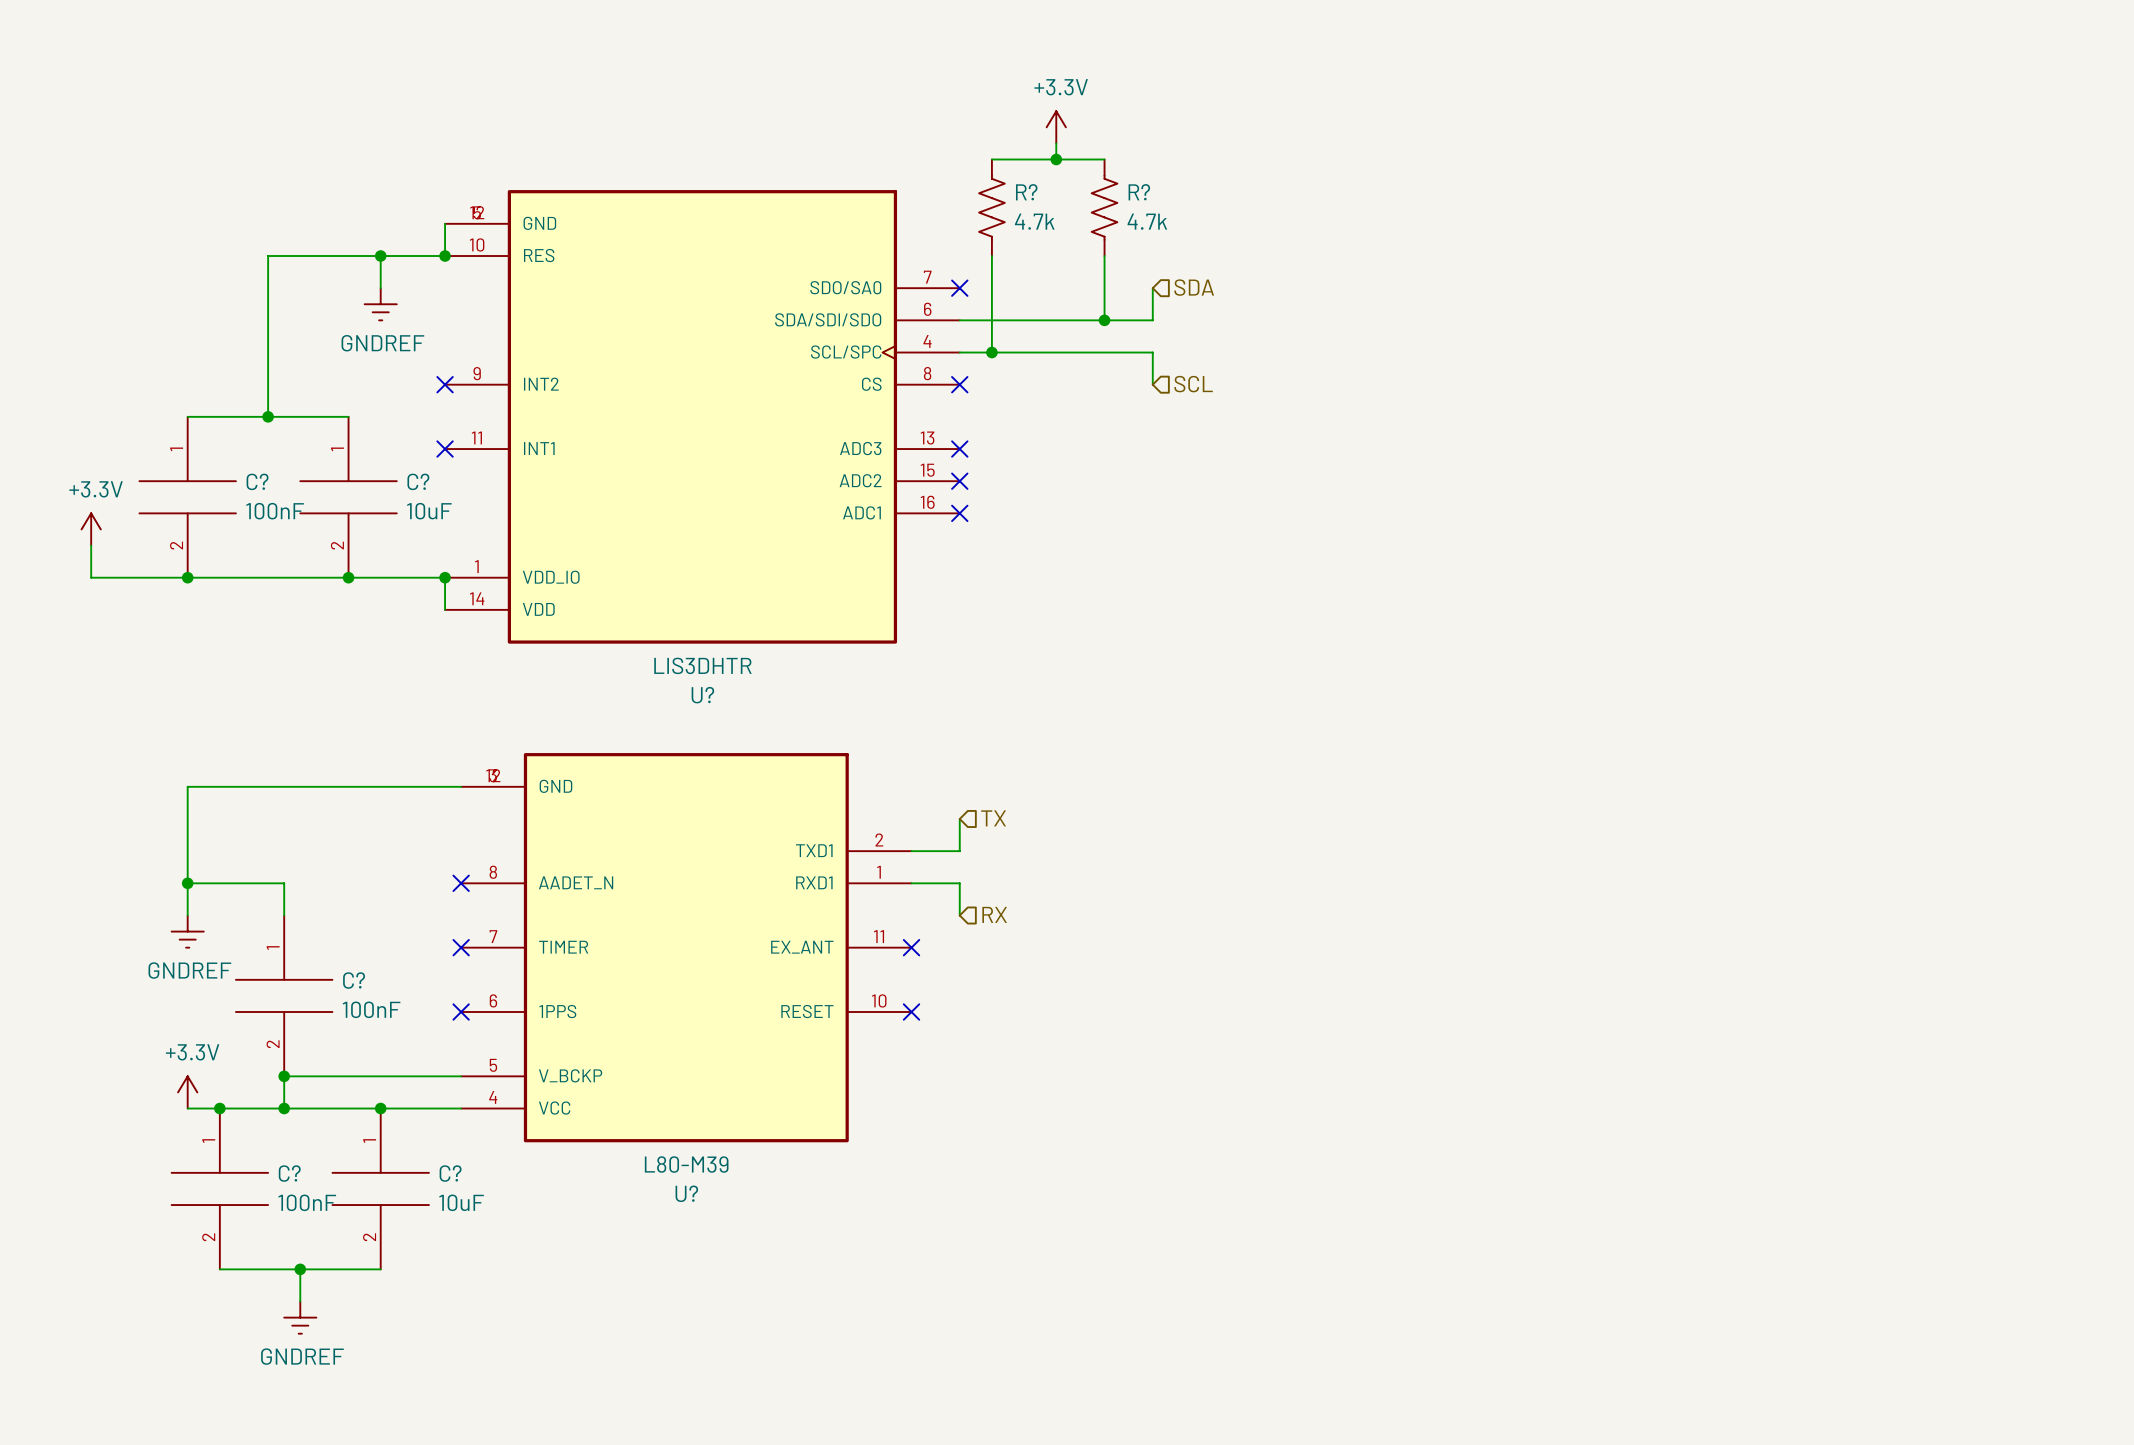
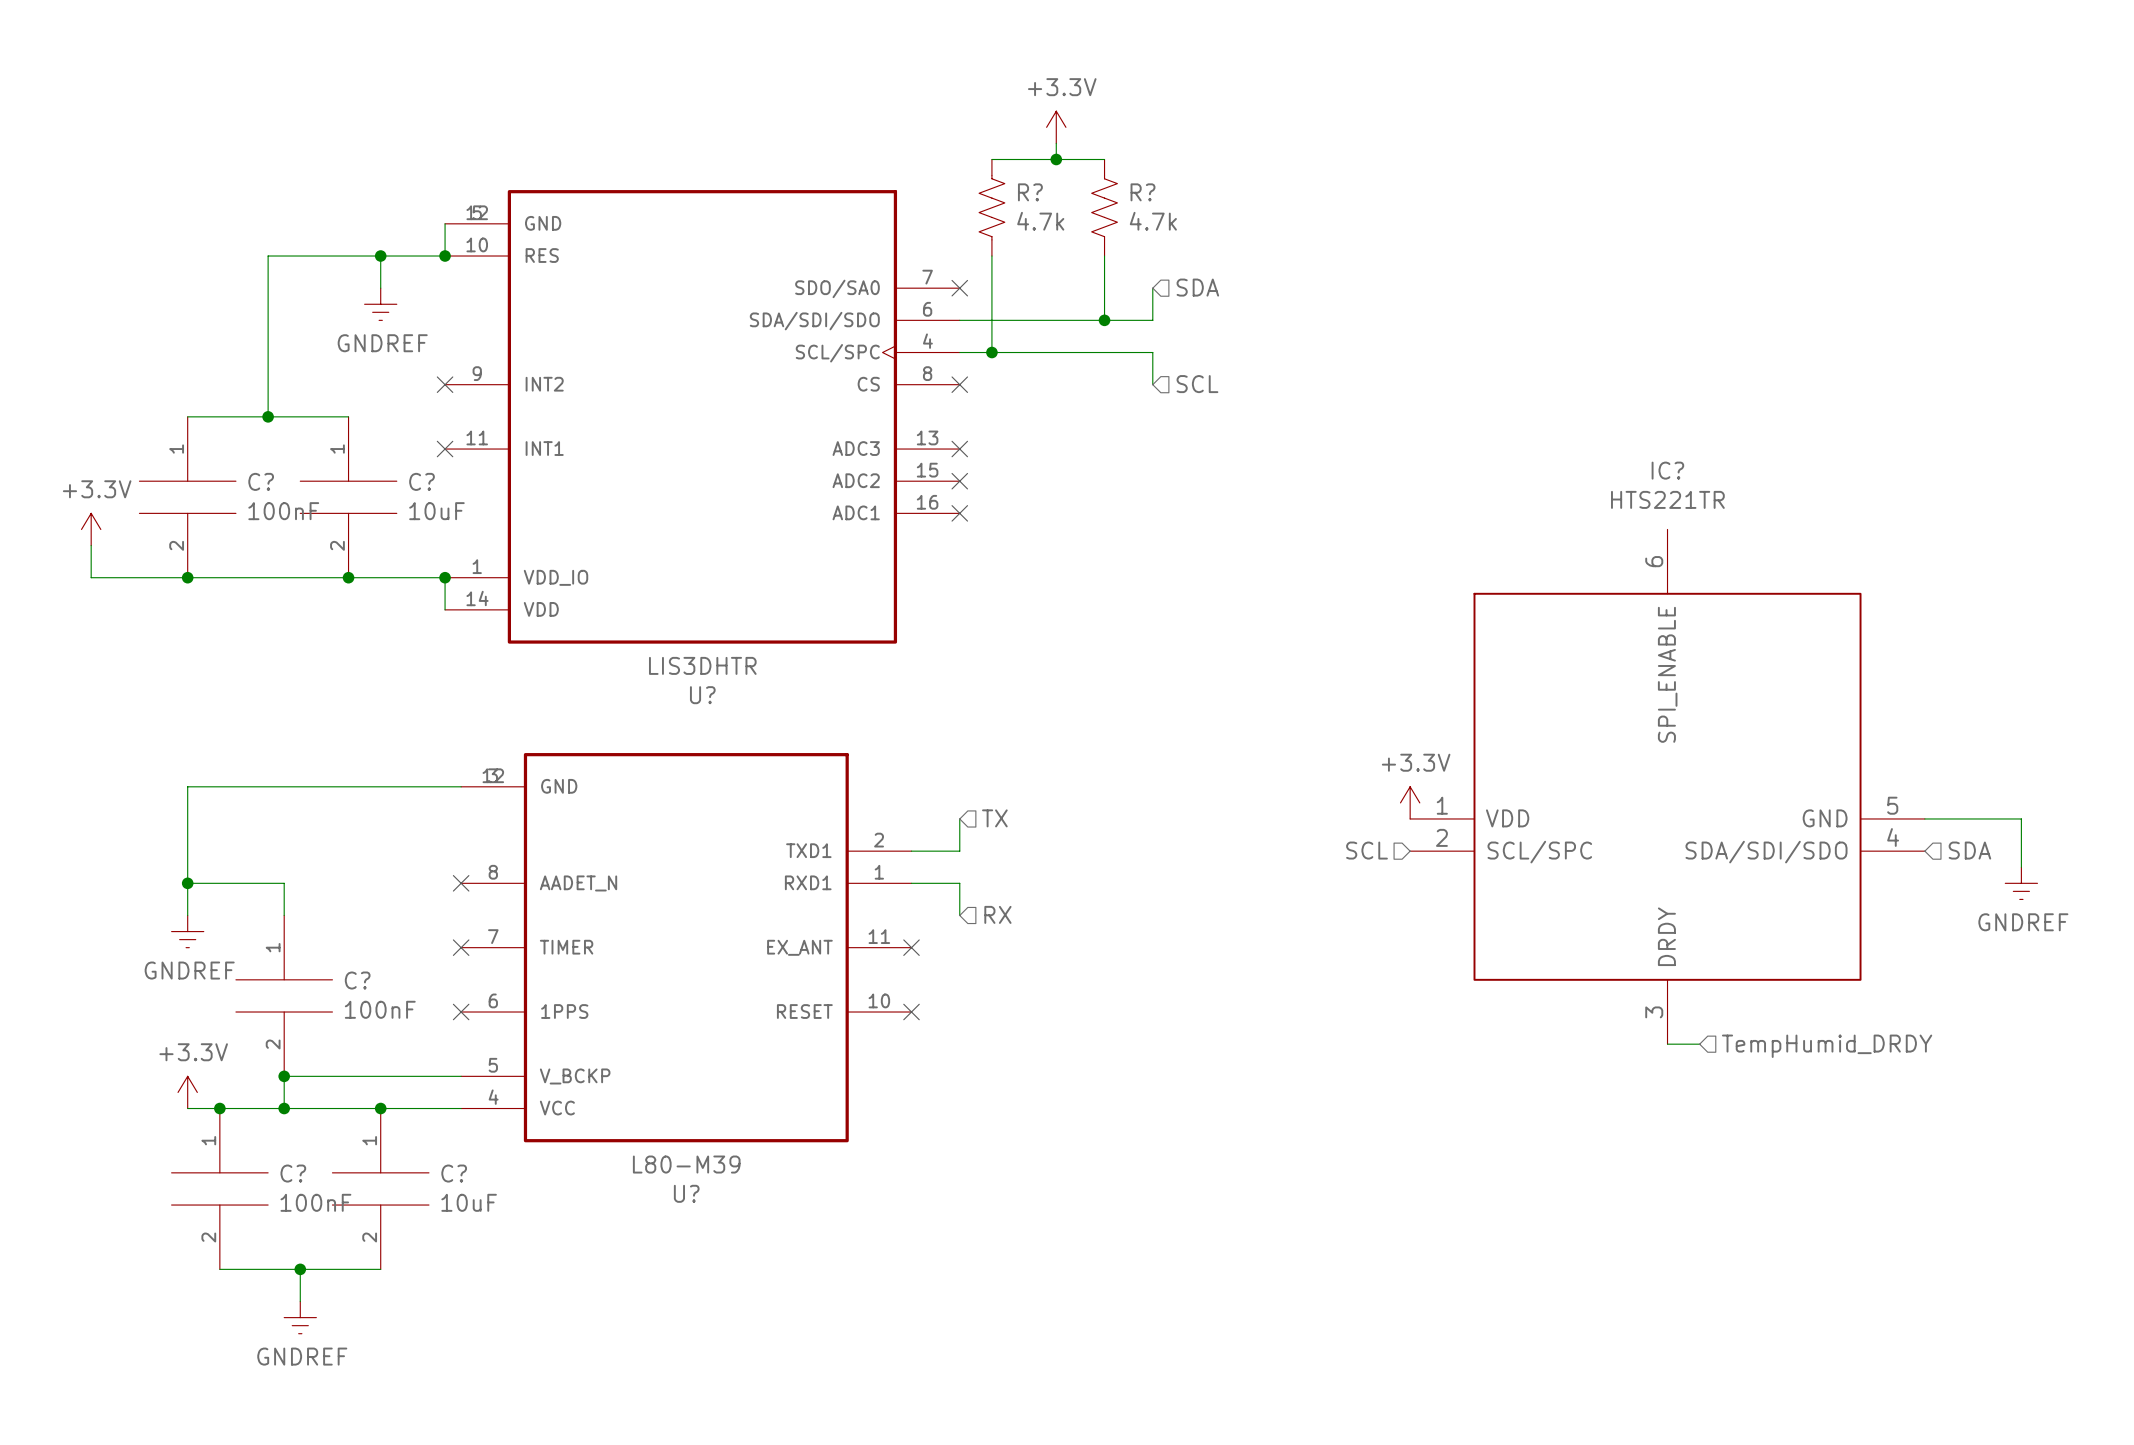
IC?: none -> HTS221TR (1667, 786)
power symbol: none -> +3.3V (1410, 802)
wire: none -> (1924, 818) (2021, 818) (2021, 867)
hierarchical label: none -> SCL (1367, 850)
hierarchical label: none -> SDA (1969, 850)
power symbol: none -> GNDREF (2021, 883)
wire: none -> (1667, 1044) (1699, 1044)
hierarchical label: none -> TempHumid_DRDY (1827, 1046)

